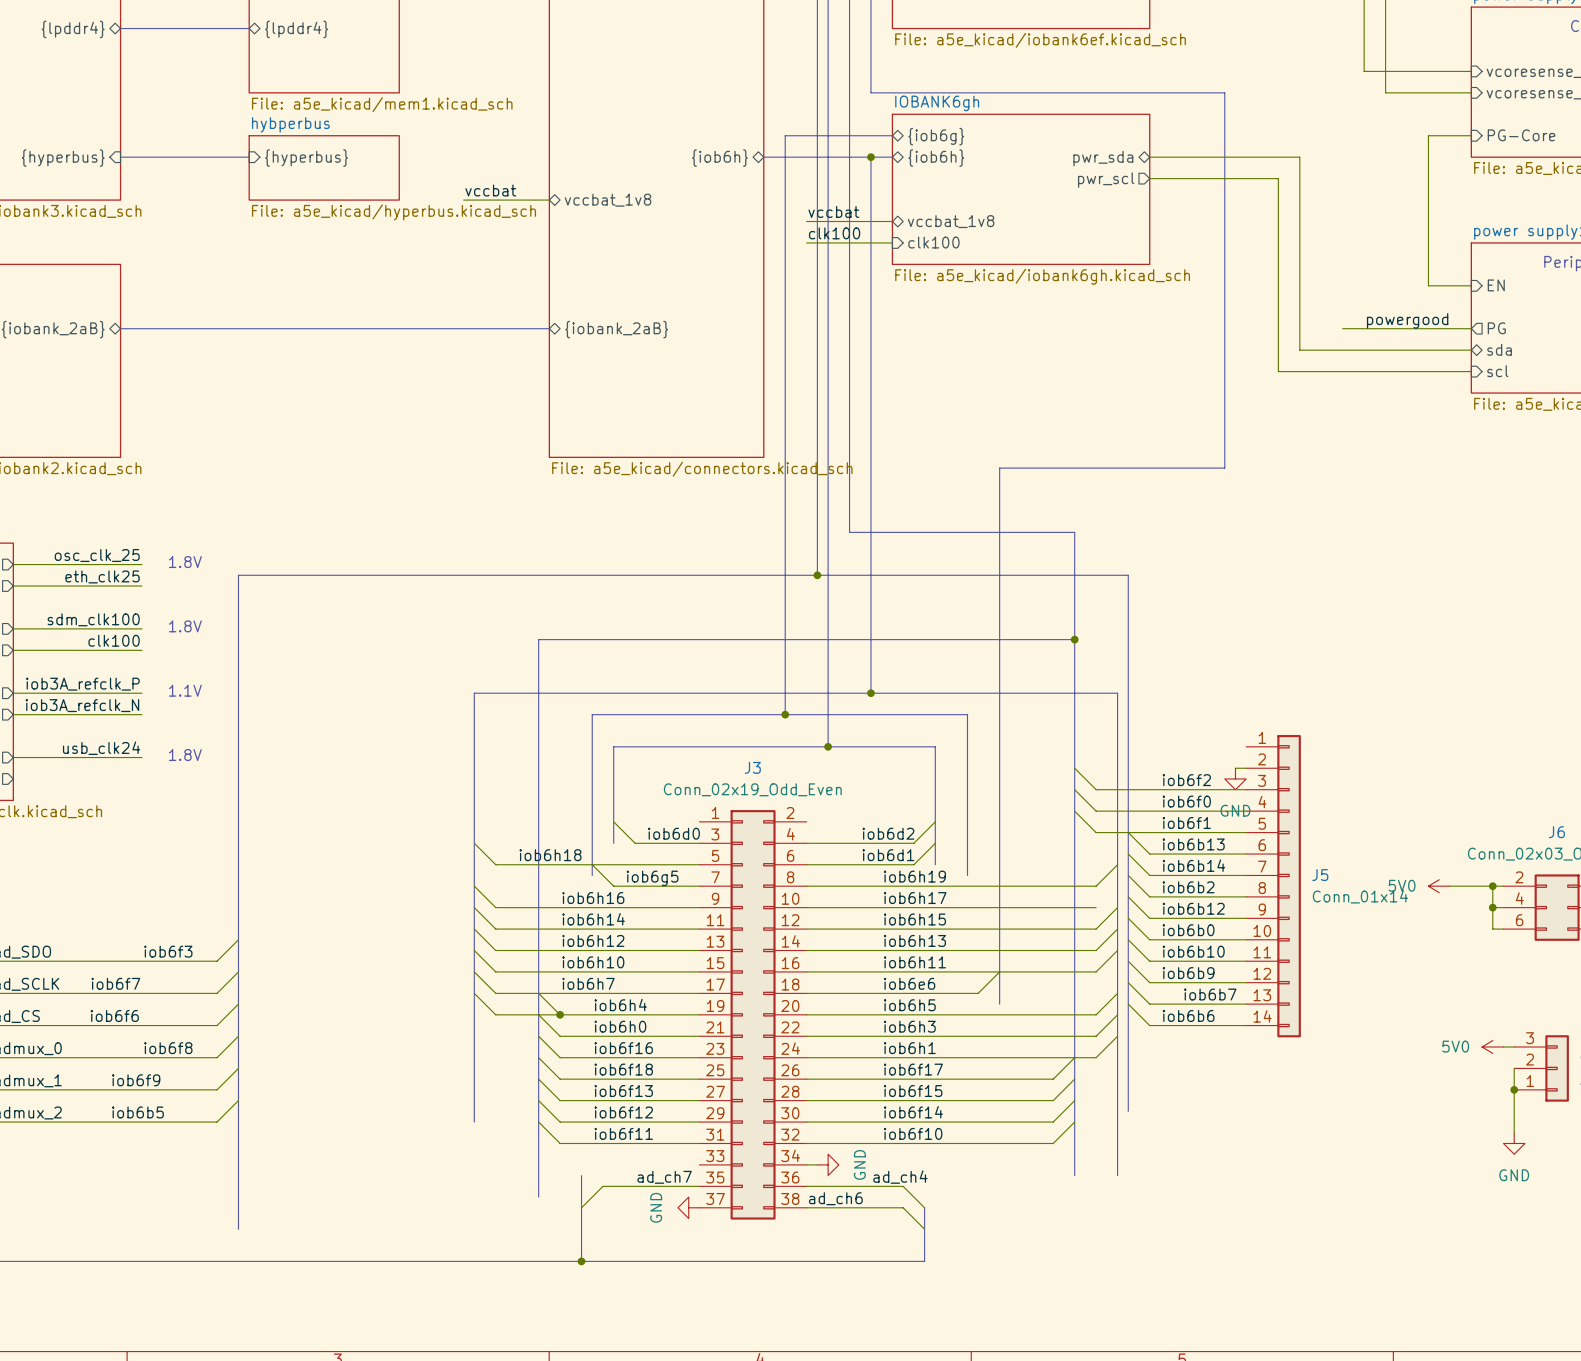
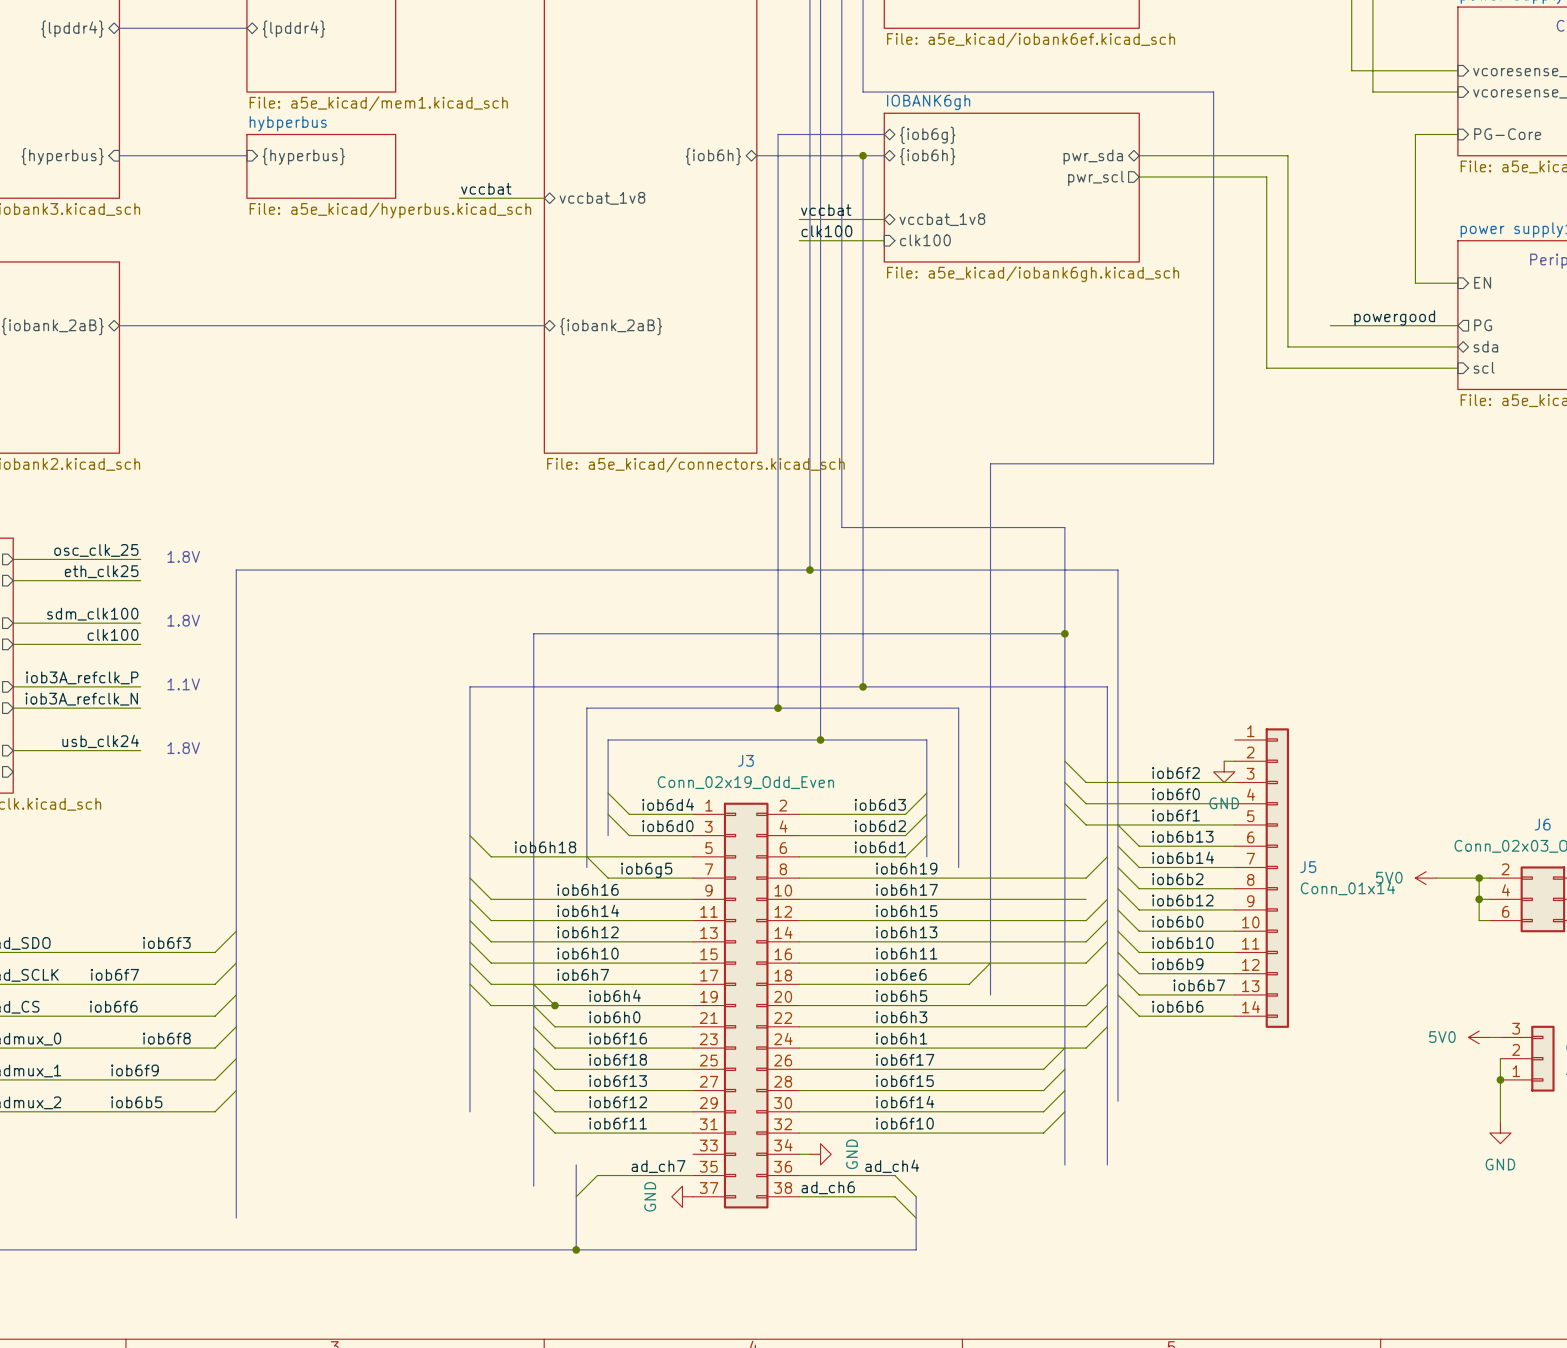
wire: none -> (608, 793) (629, 814) (693, 814)
wire: none -> (926, 793) (905, 814) (799, 814)
label: none -> iob6d4 (668, 804)
label: none -> iob6d3 (880, 804)

